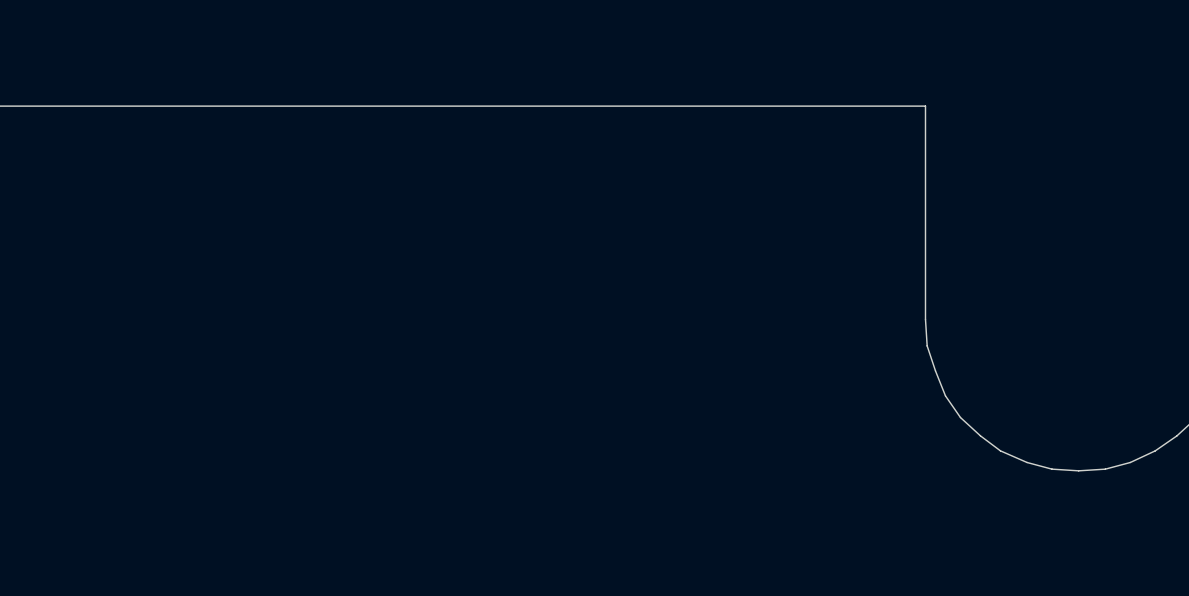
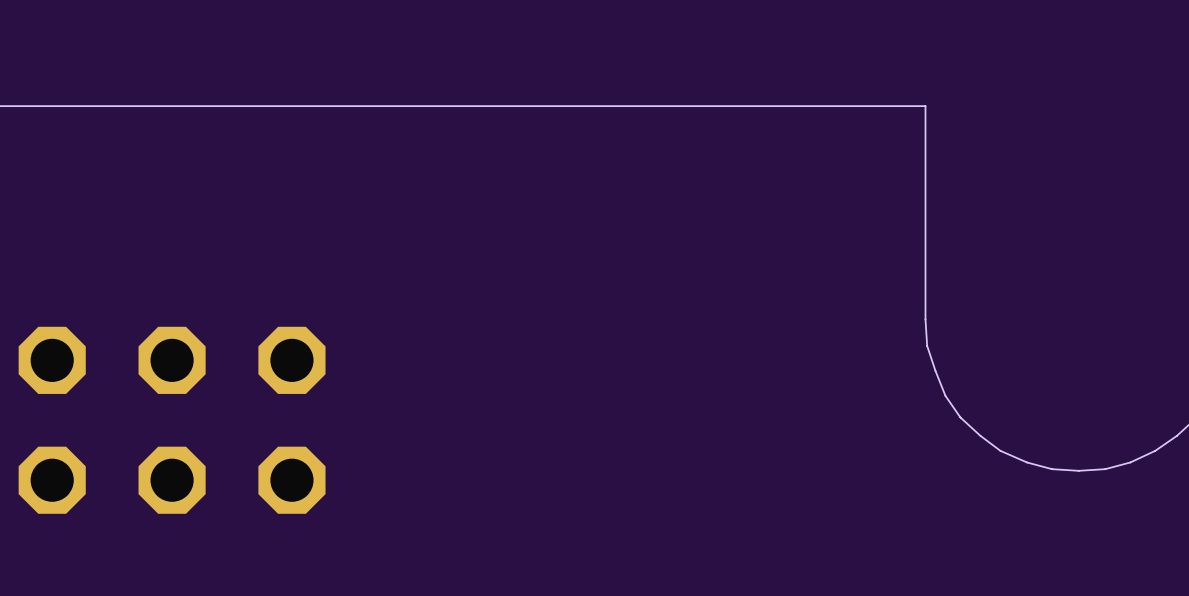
part: none -> (172, 420)

